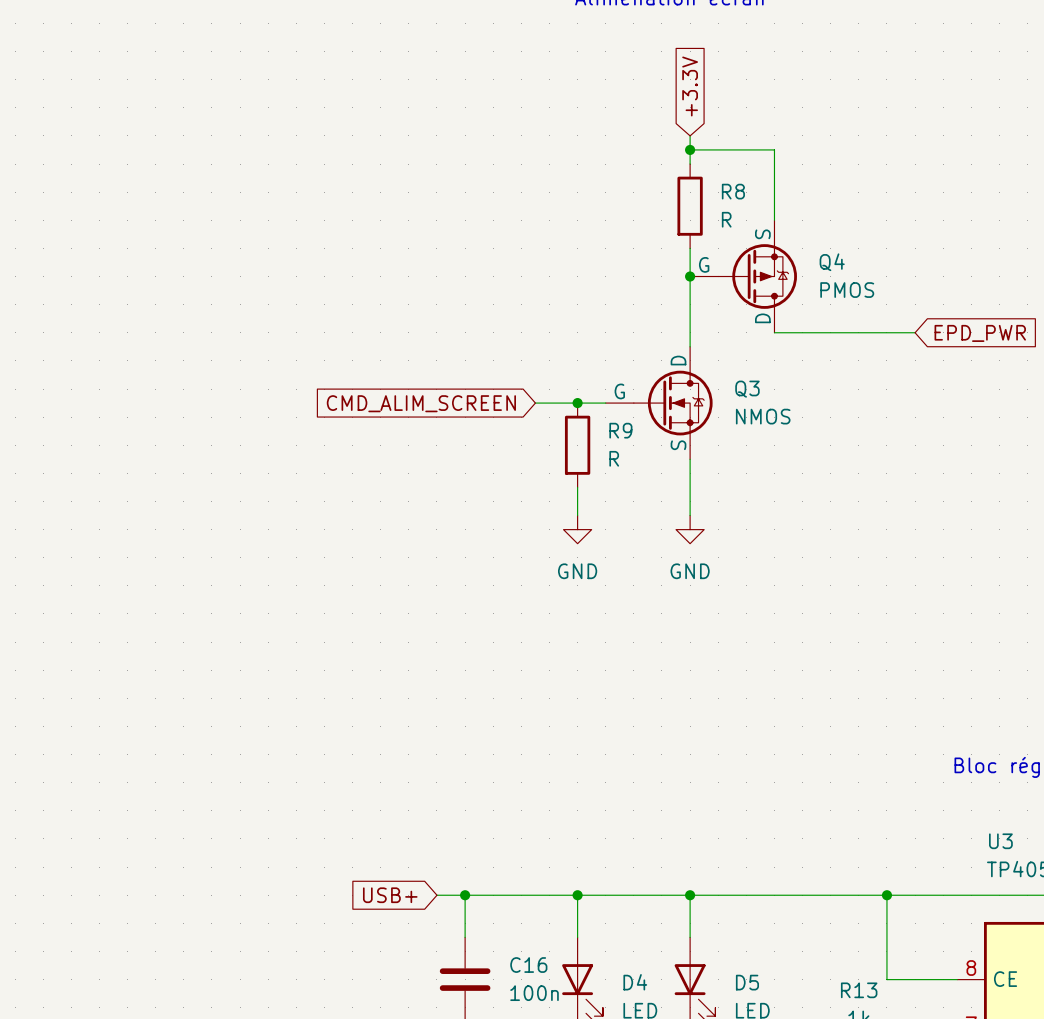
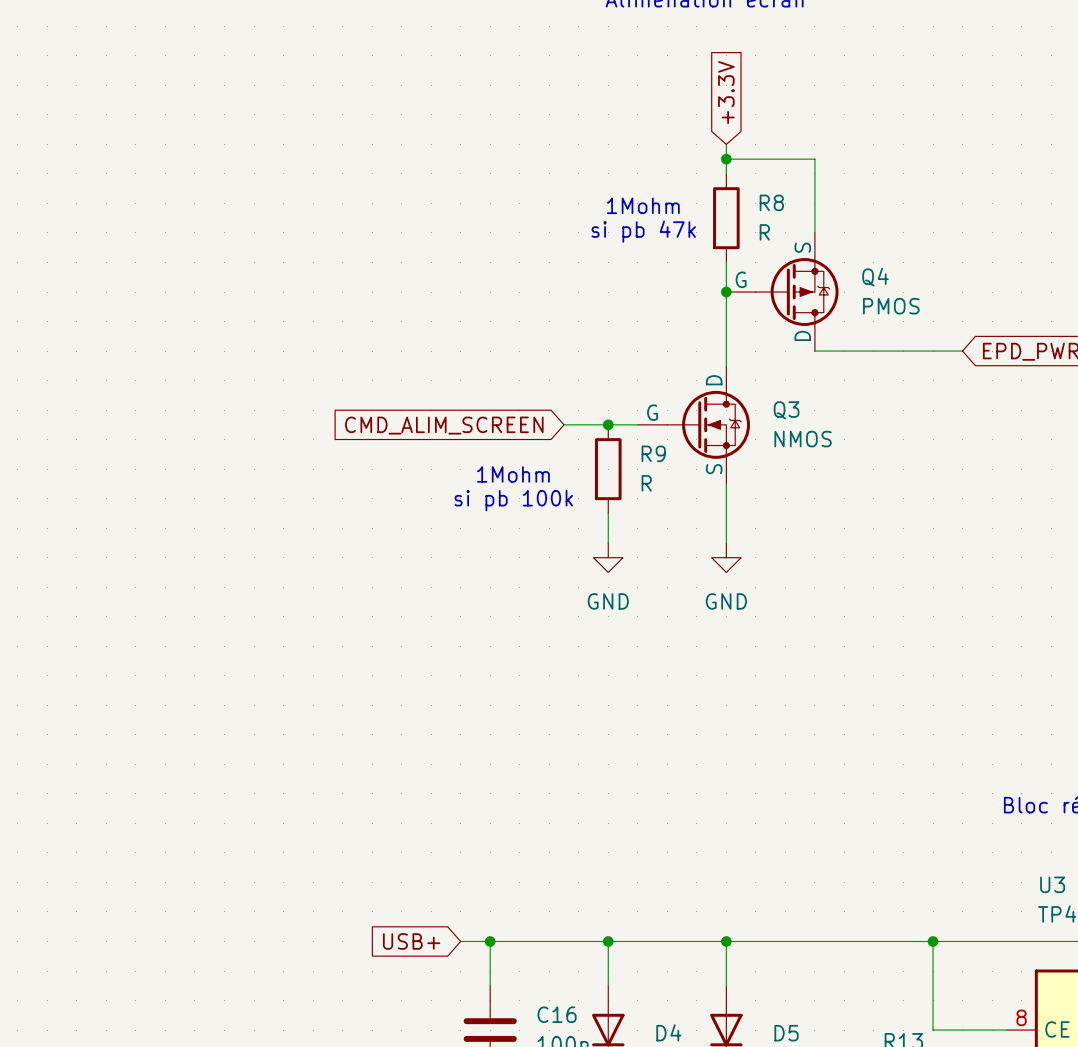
text: none -> 1Mohm (643, 205)
text: none -> si pb 47k (643, 231)
text: none -> 1Mohm (513, 474)
text: none -> si pb 100k (513, 500)

